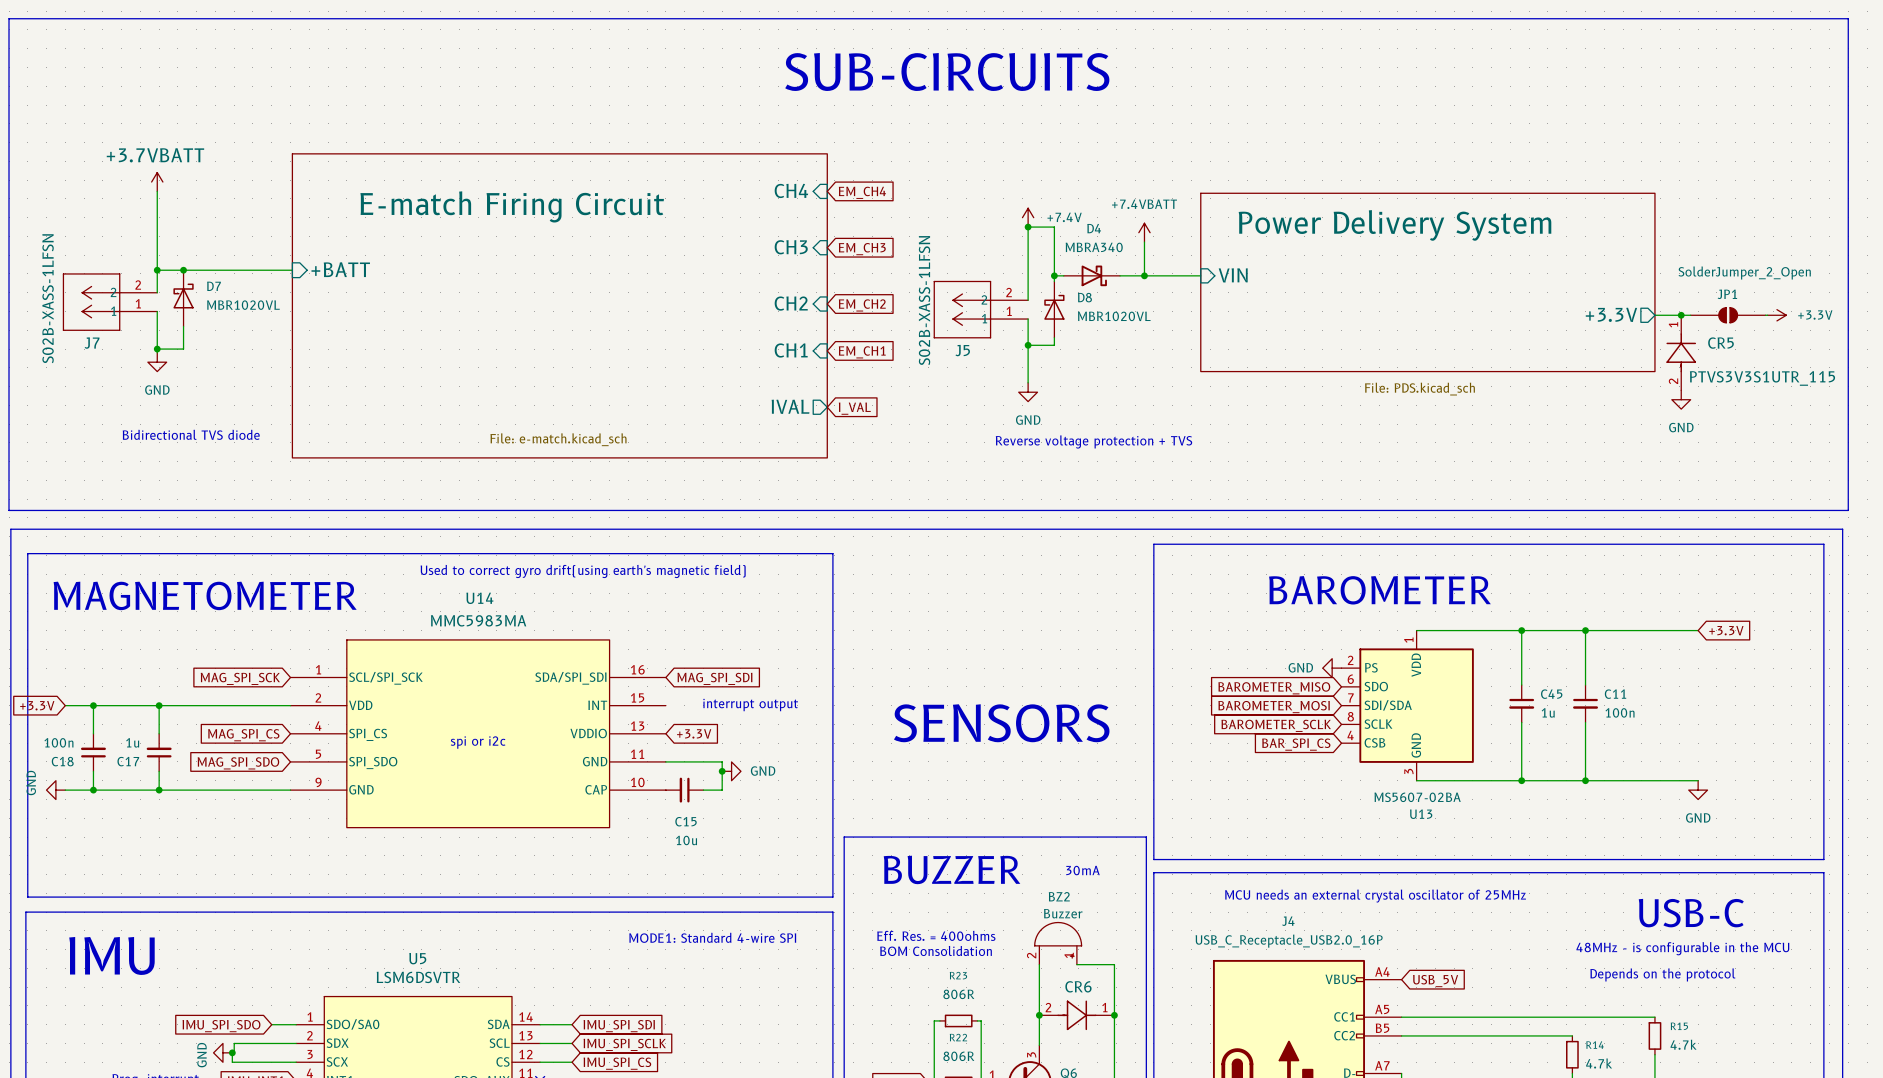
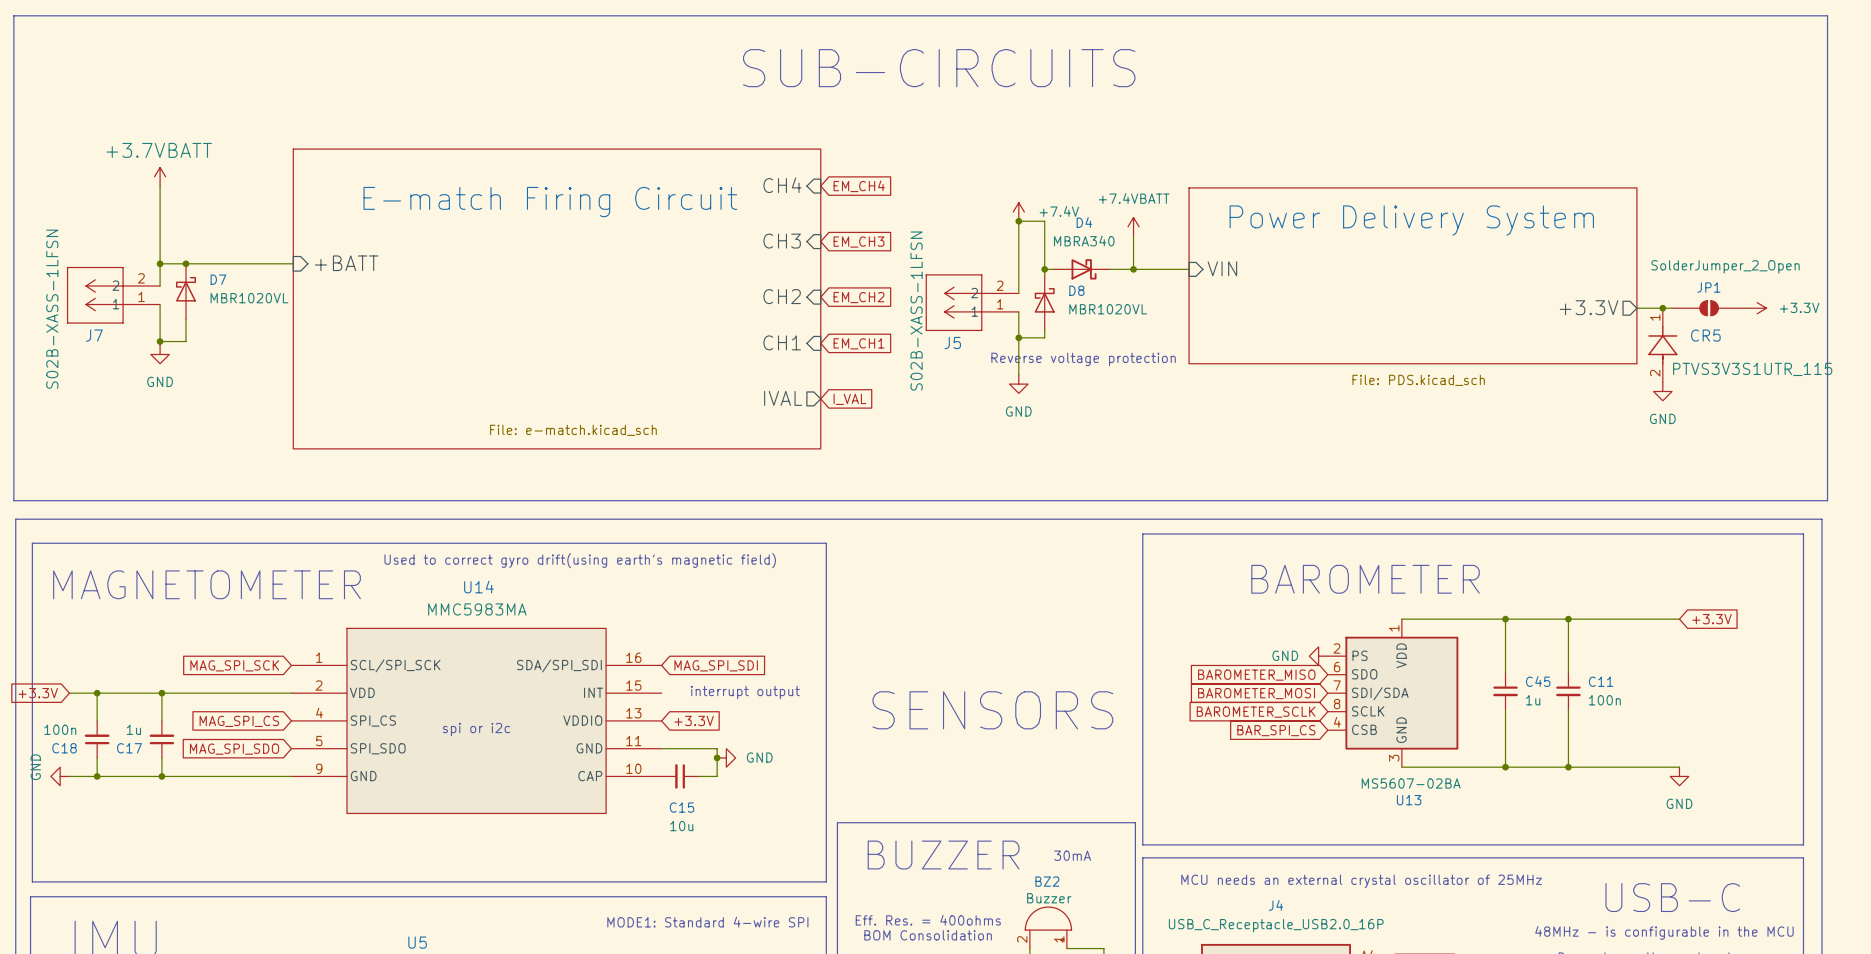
text: none -> Reverse voltage protection (1083, 359)
text: Bidirectional TVS diode (191, 434) -> none
text: Reverse voltage protection + TVS (1093, 441) -> none

